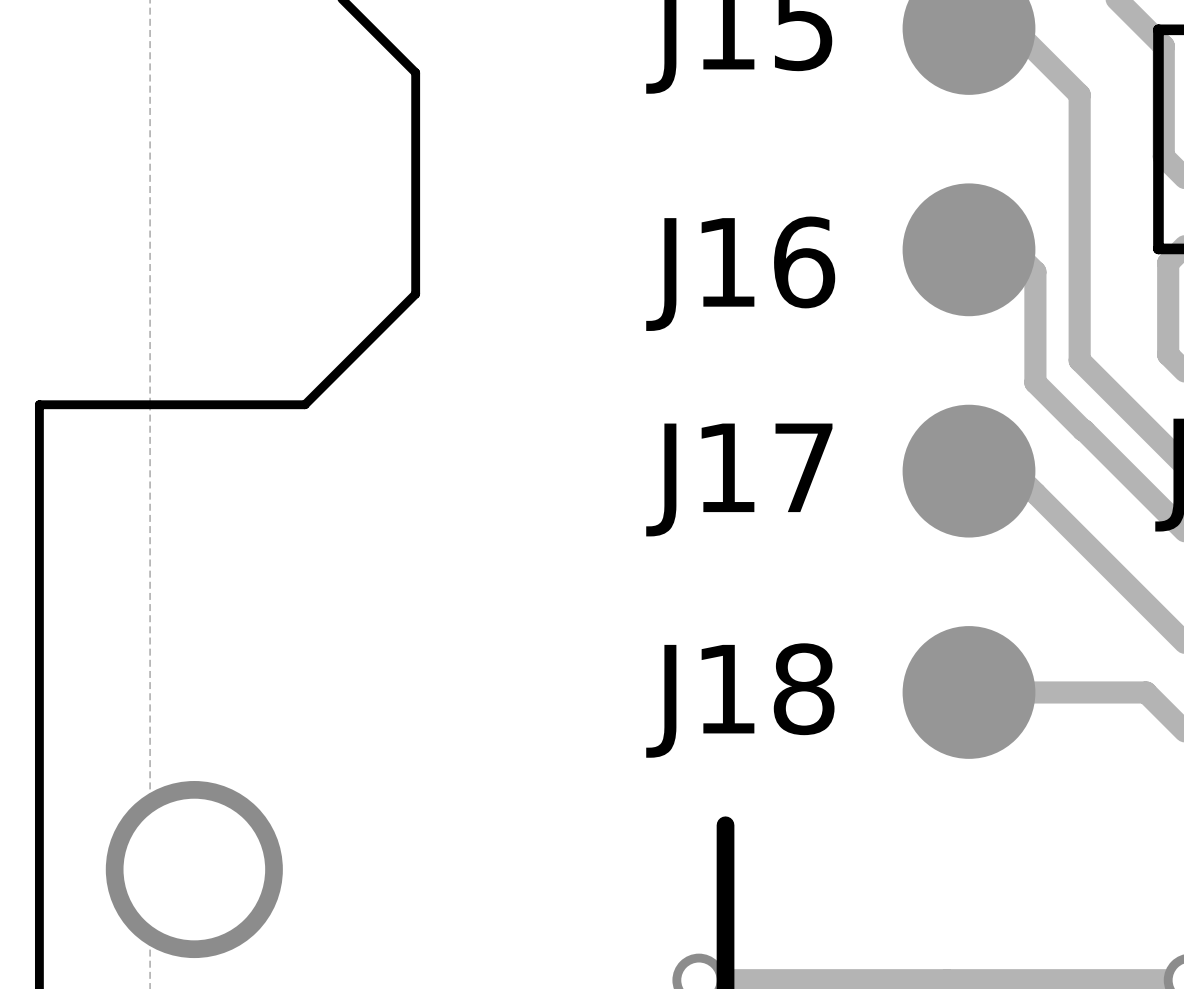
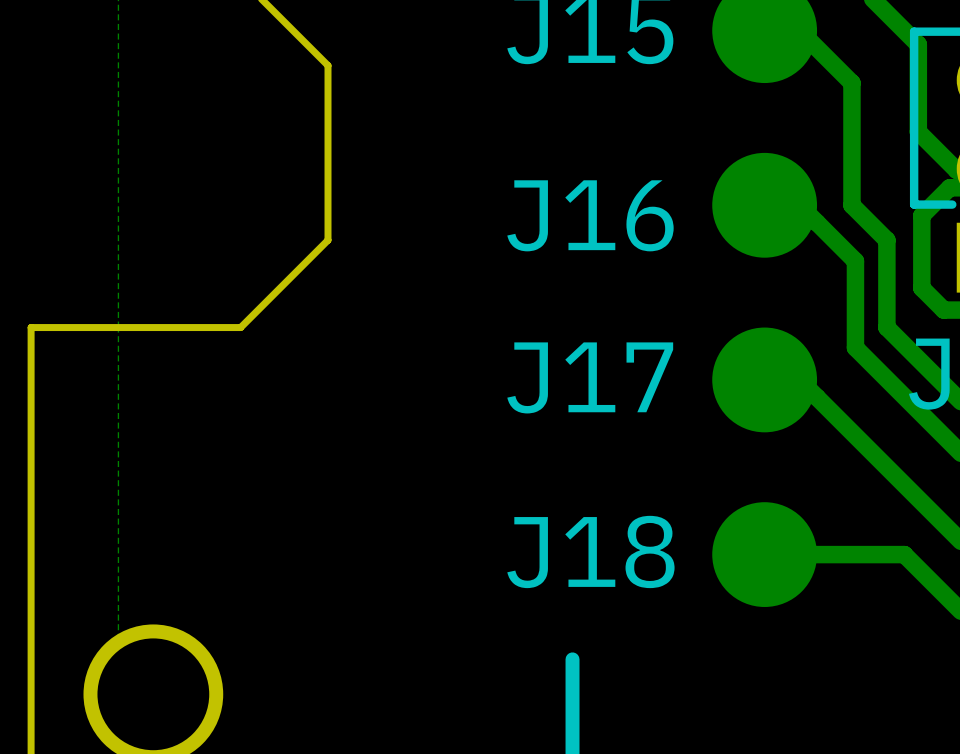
track: (1079, 249) (1079, 360) (1123, 404) -> (851, 205) (886, 240) (886, 327)
track: (1035, 271) (1035, 382) (1083, 430) -> (817, 222) (855, 261) (855, 347)

